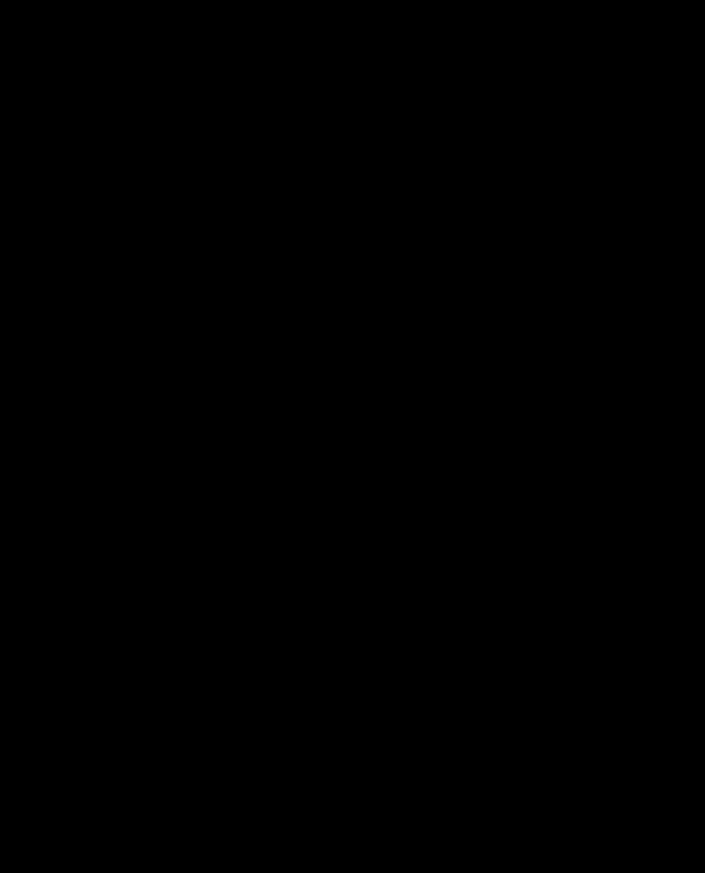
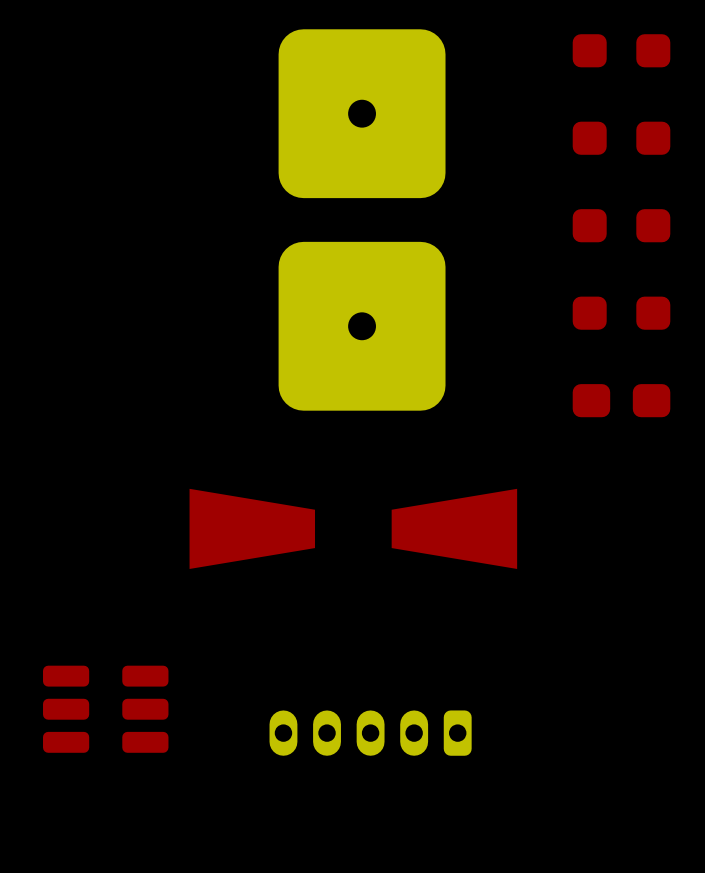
part: none -> (621, 50)
part: none -> (362, 113)
part: none -> (621, 138)
part: none -> (621, 225)
part: none -> (621, 313)
part: none -> (362, 326)
part: none -> (621, 400)
part: none -> (353, 528)
part: none -> (105, 709)
part: none -> (370, 733)

